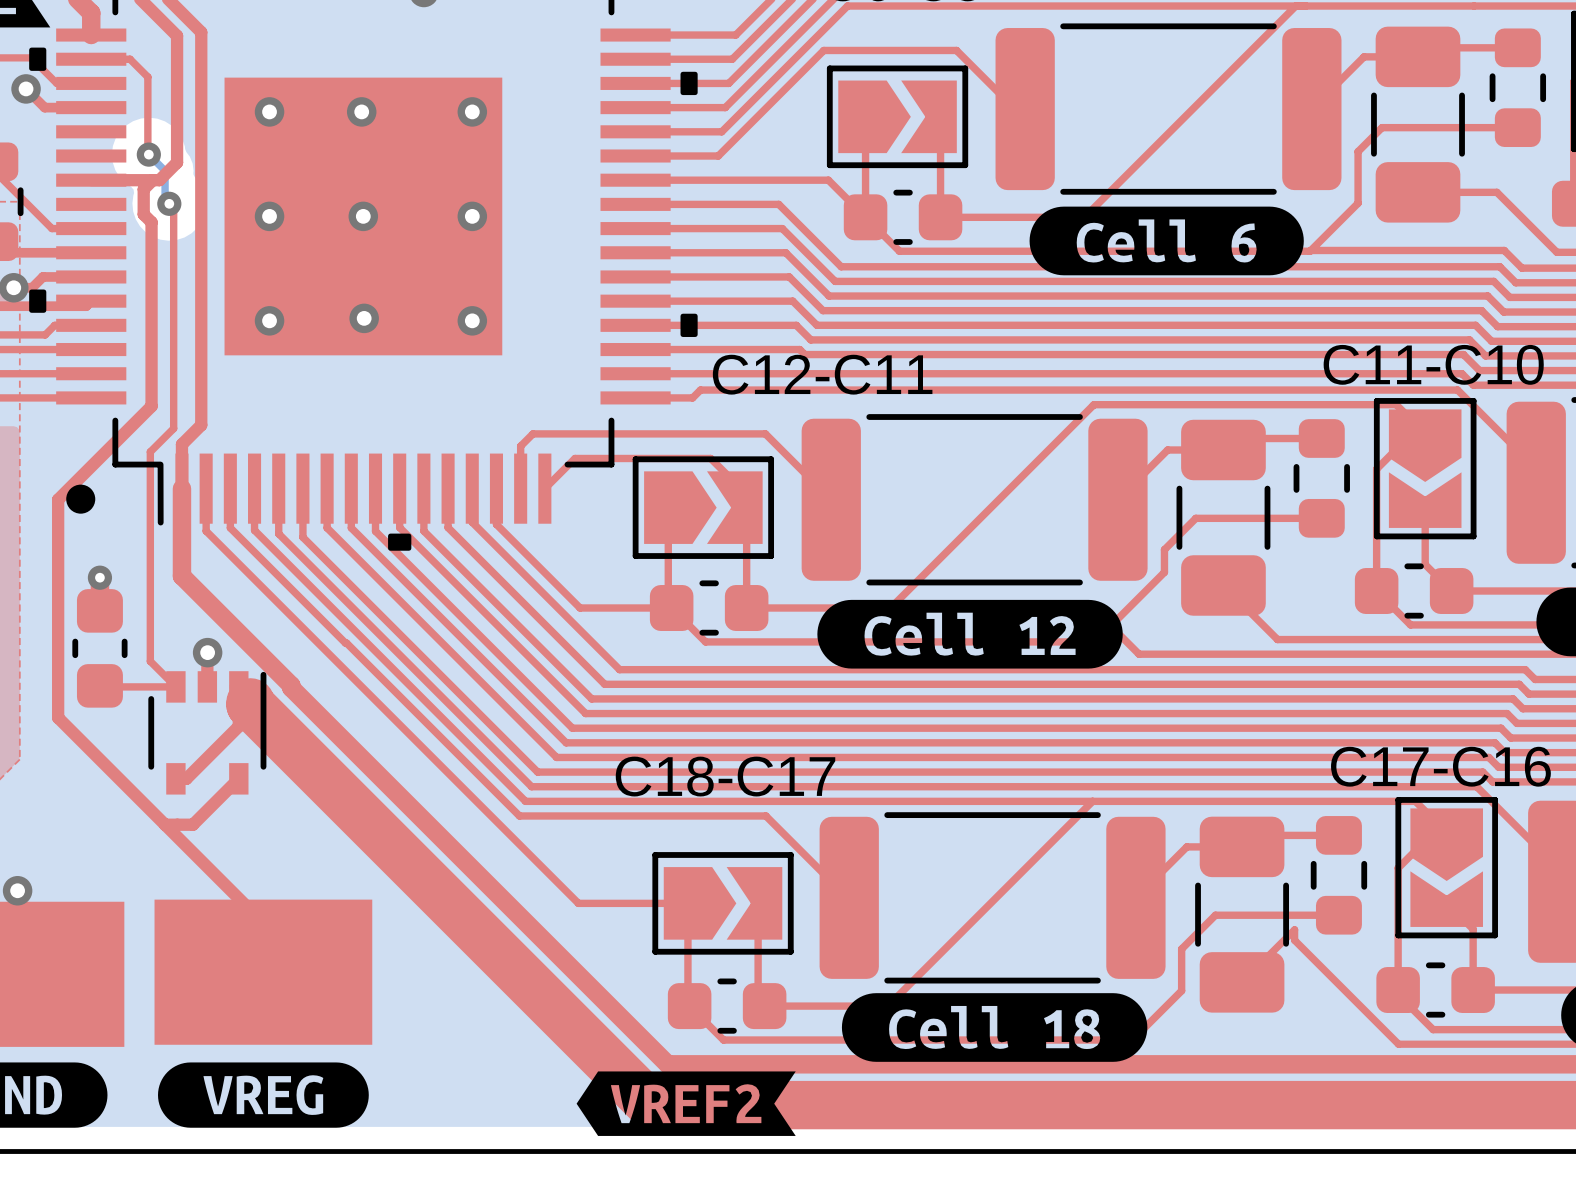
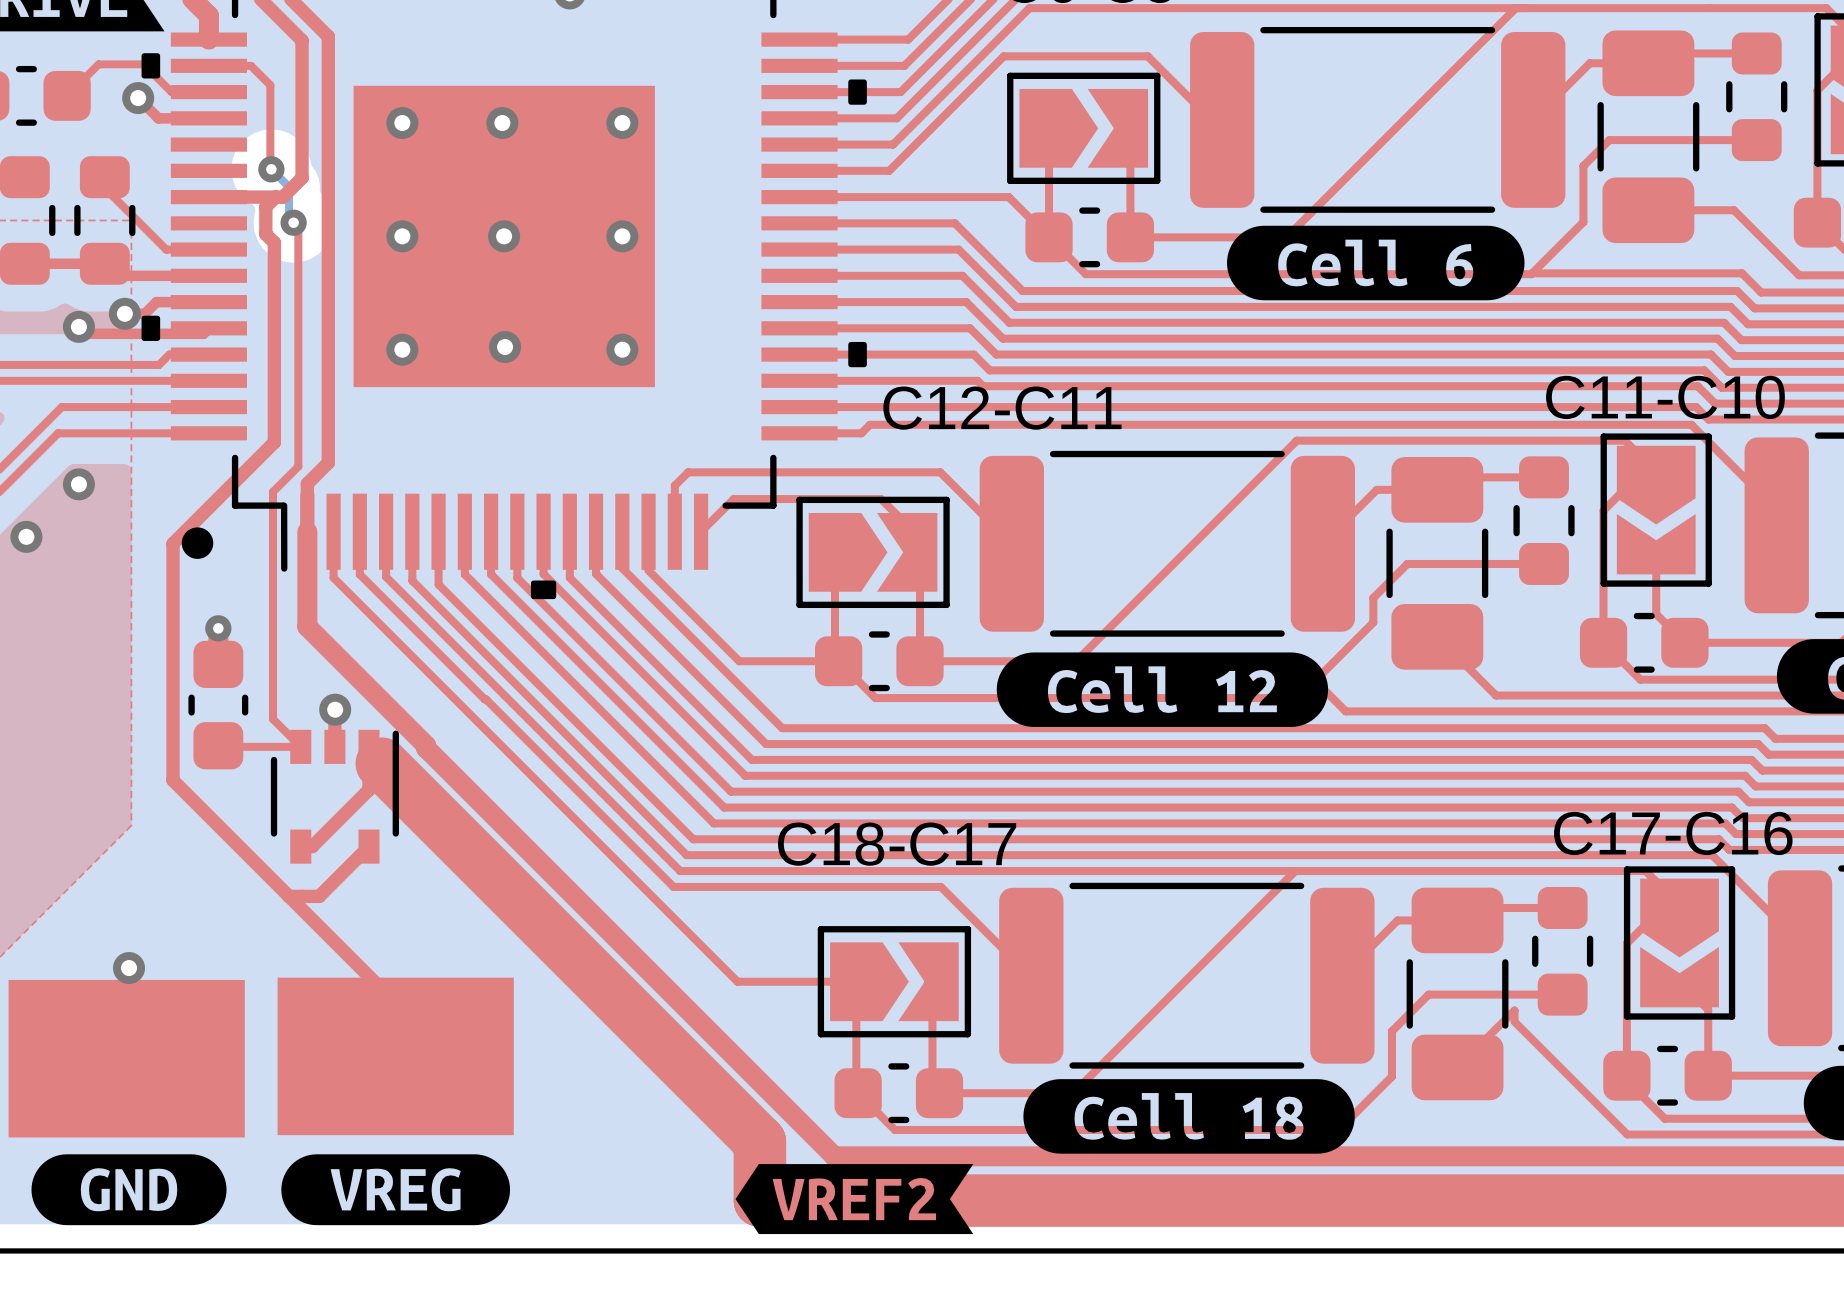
top track: (250, 702) (250, 704) (650, 1105) -> (381, 763) (759, 1141) (759, 1200) (816, 1200)

